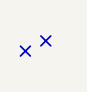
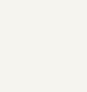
no-connect mark: (45, 40) -> none
no-connect mark: (25, 51) -> none

